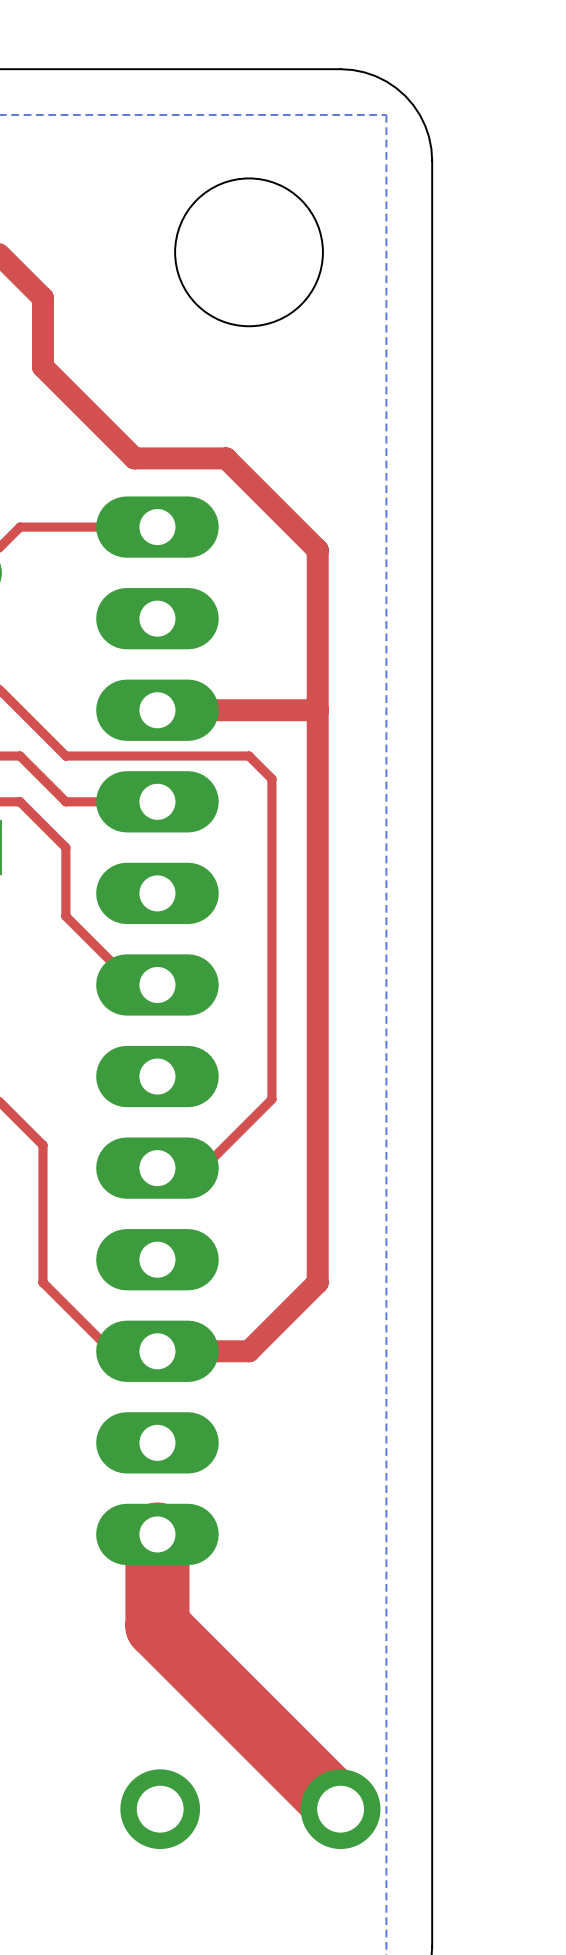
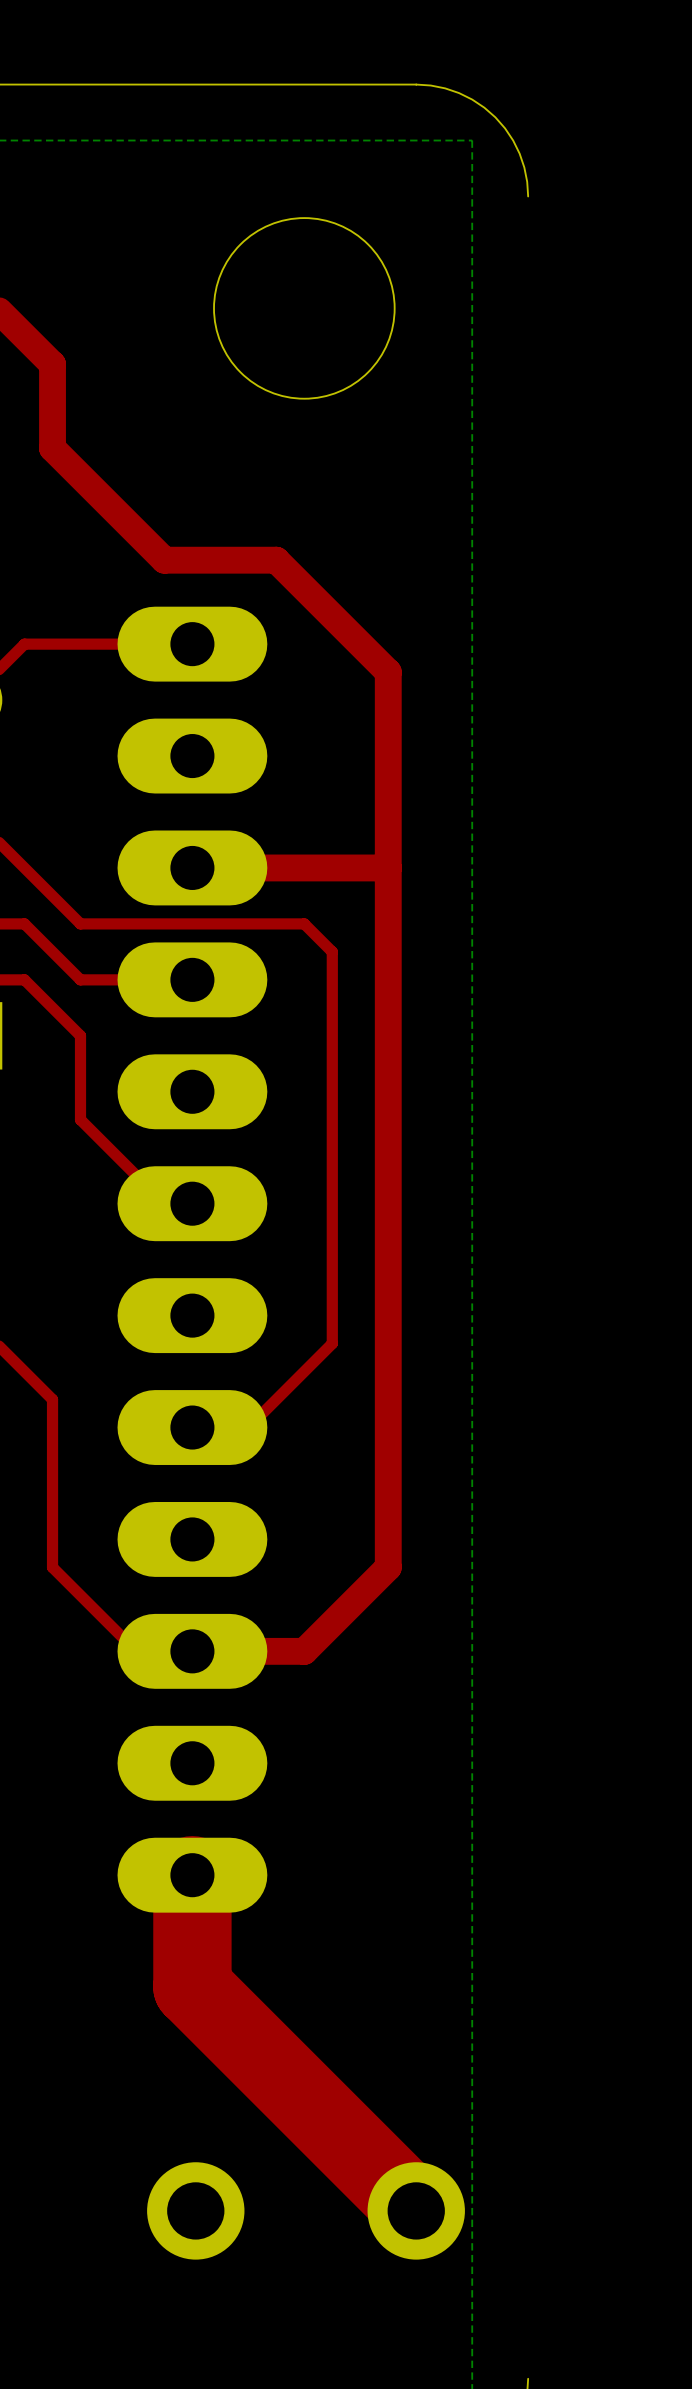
board edge: (432, 160) (432, 1946) -> none

